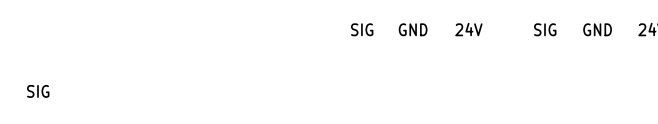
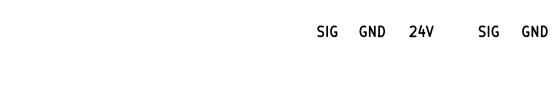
text: SIG (38, 91) -> none

